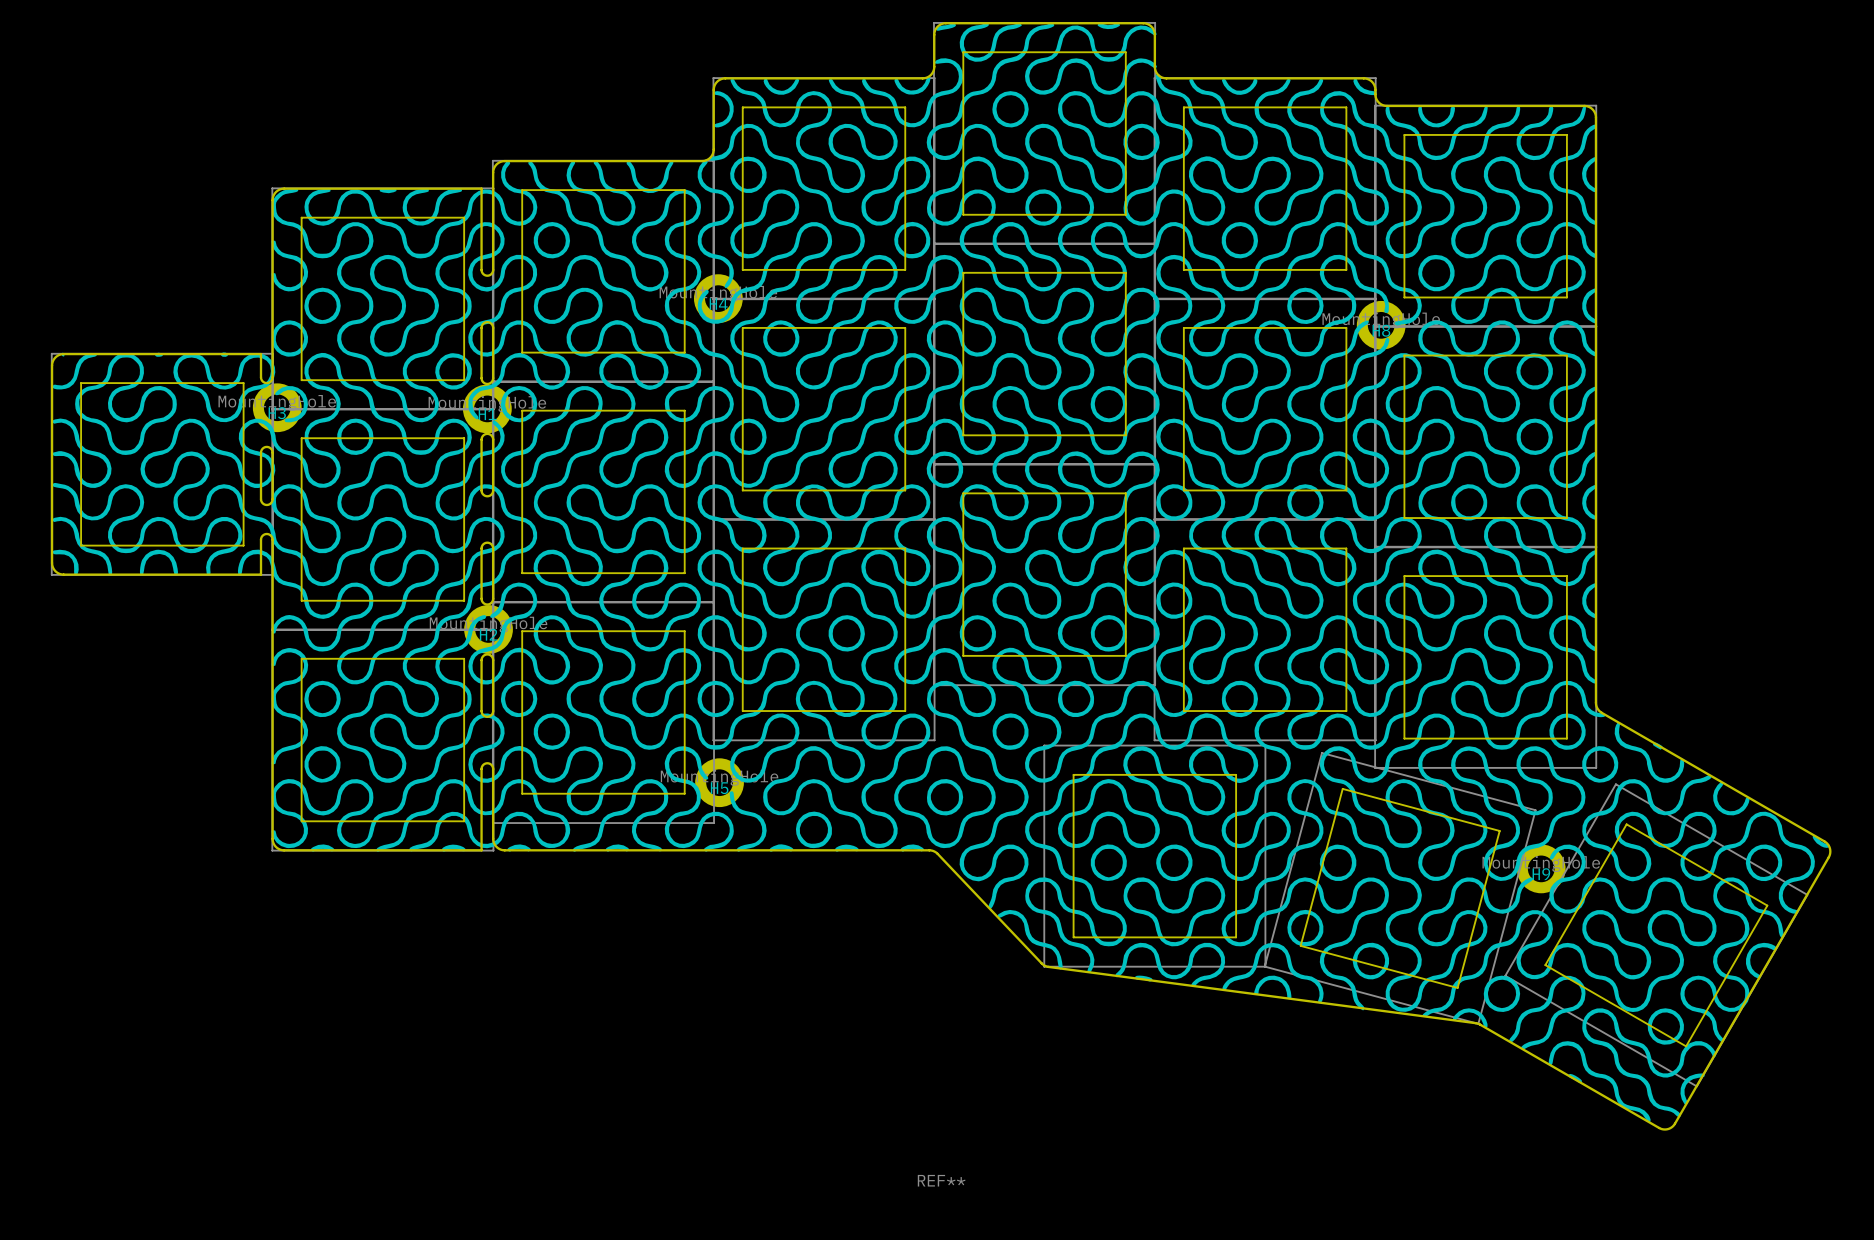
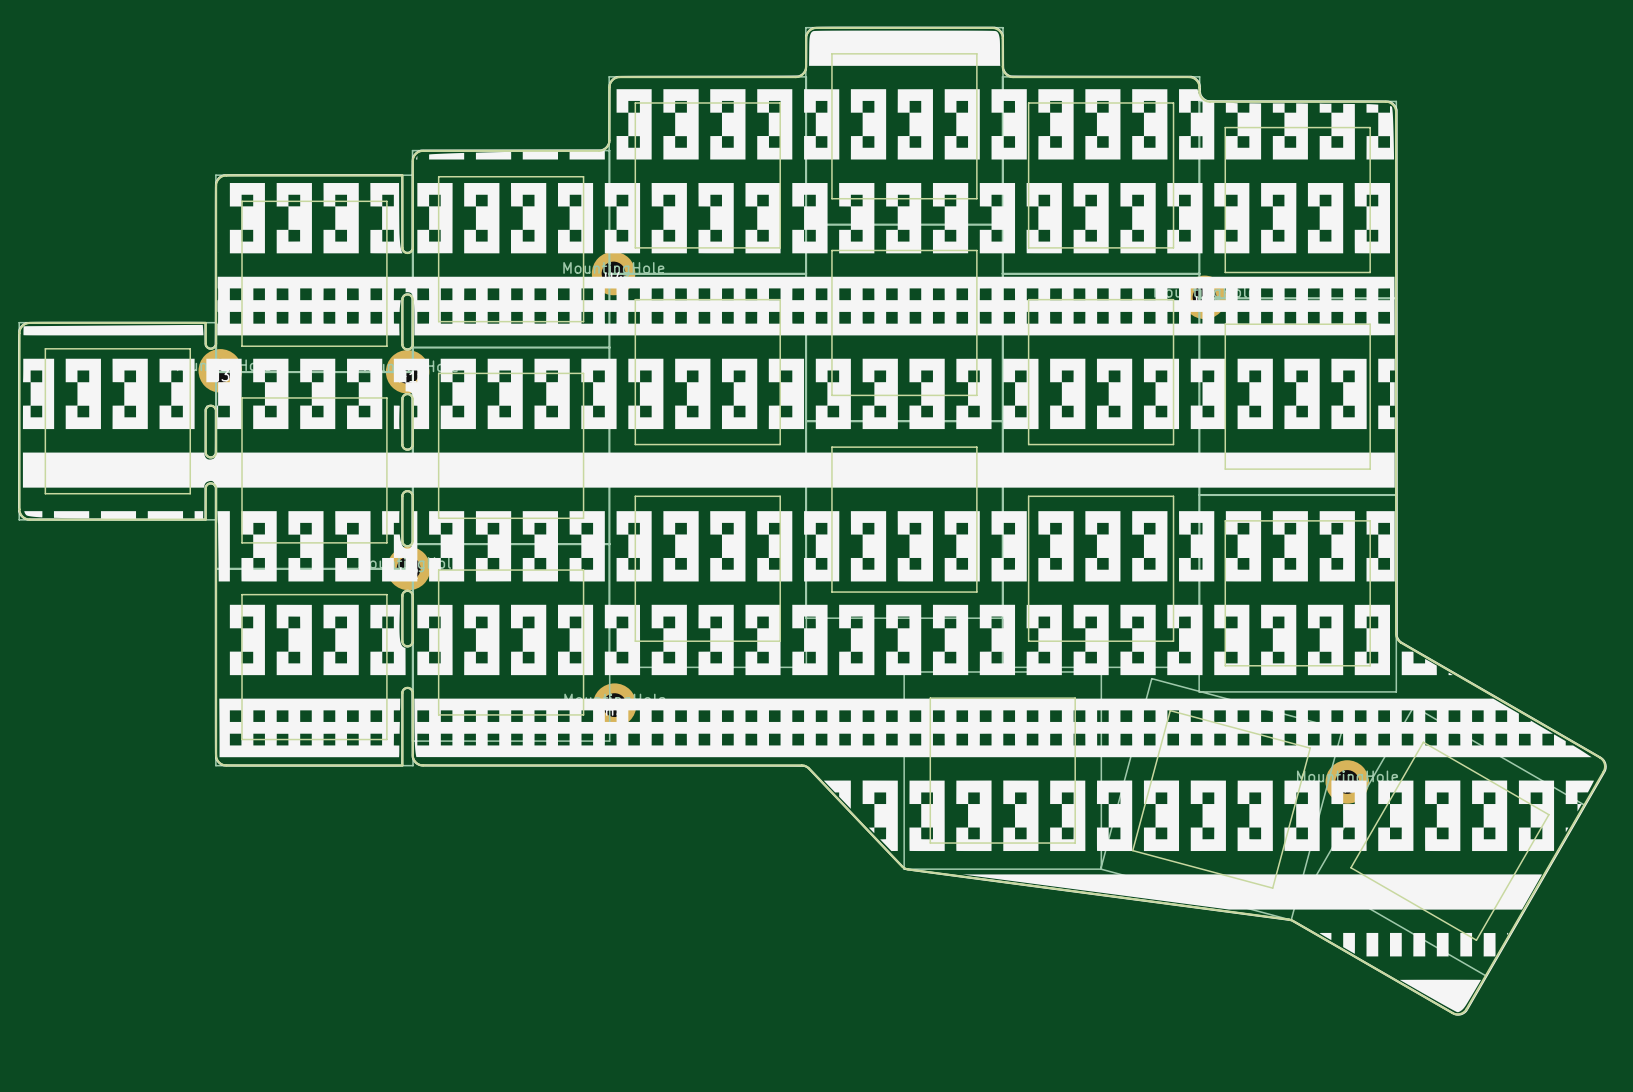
drawing: none -> [18, 26, 1607, 1016]
REF**: (941, 572) -> none

